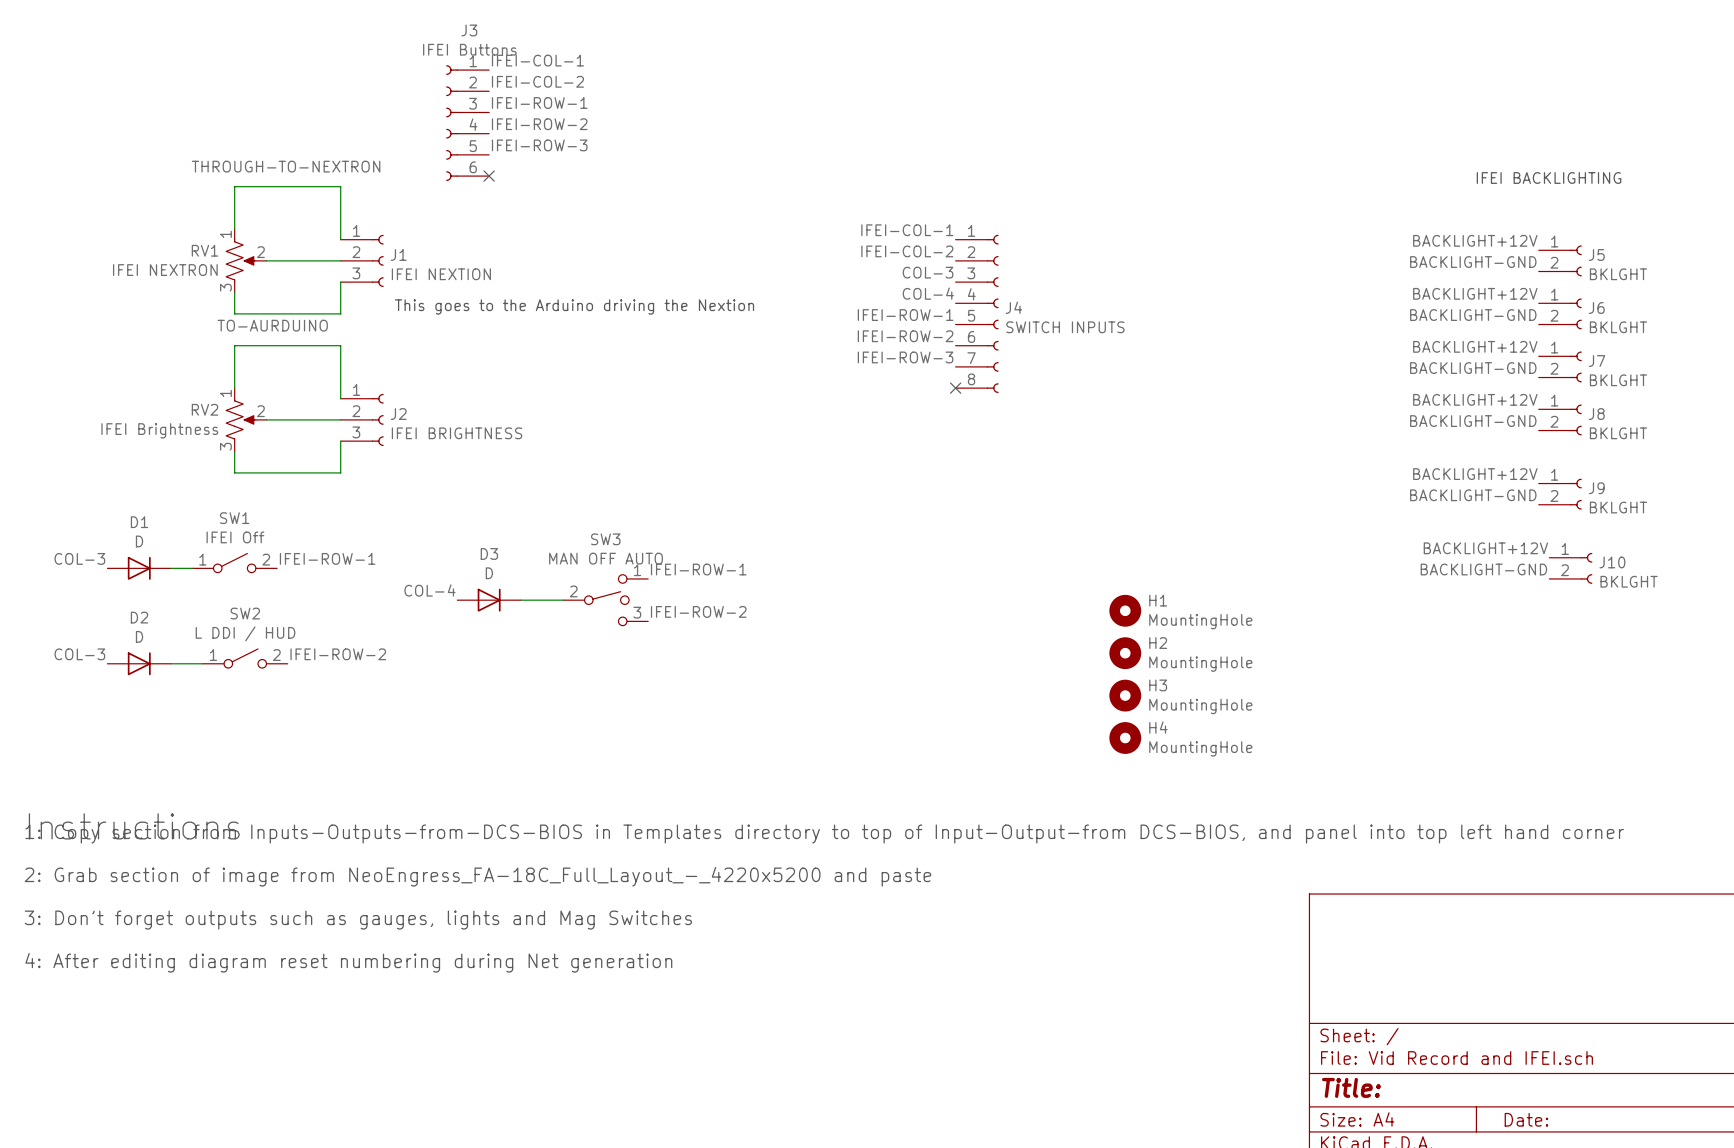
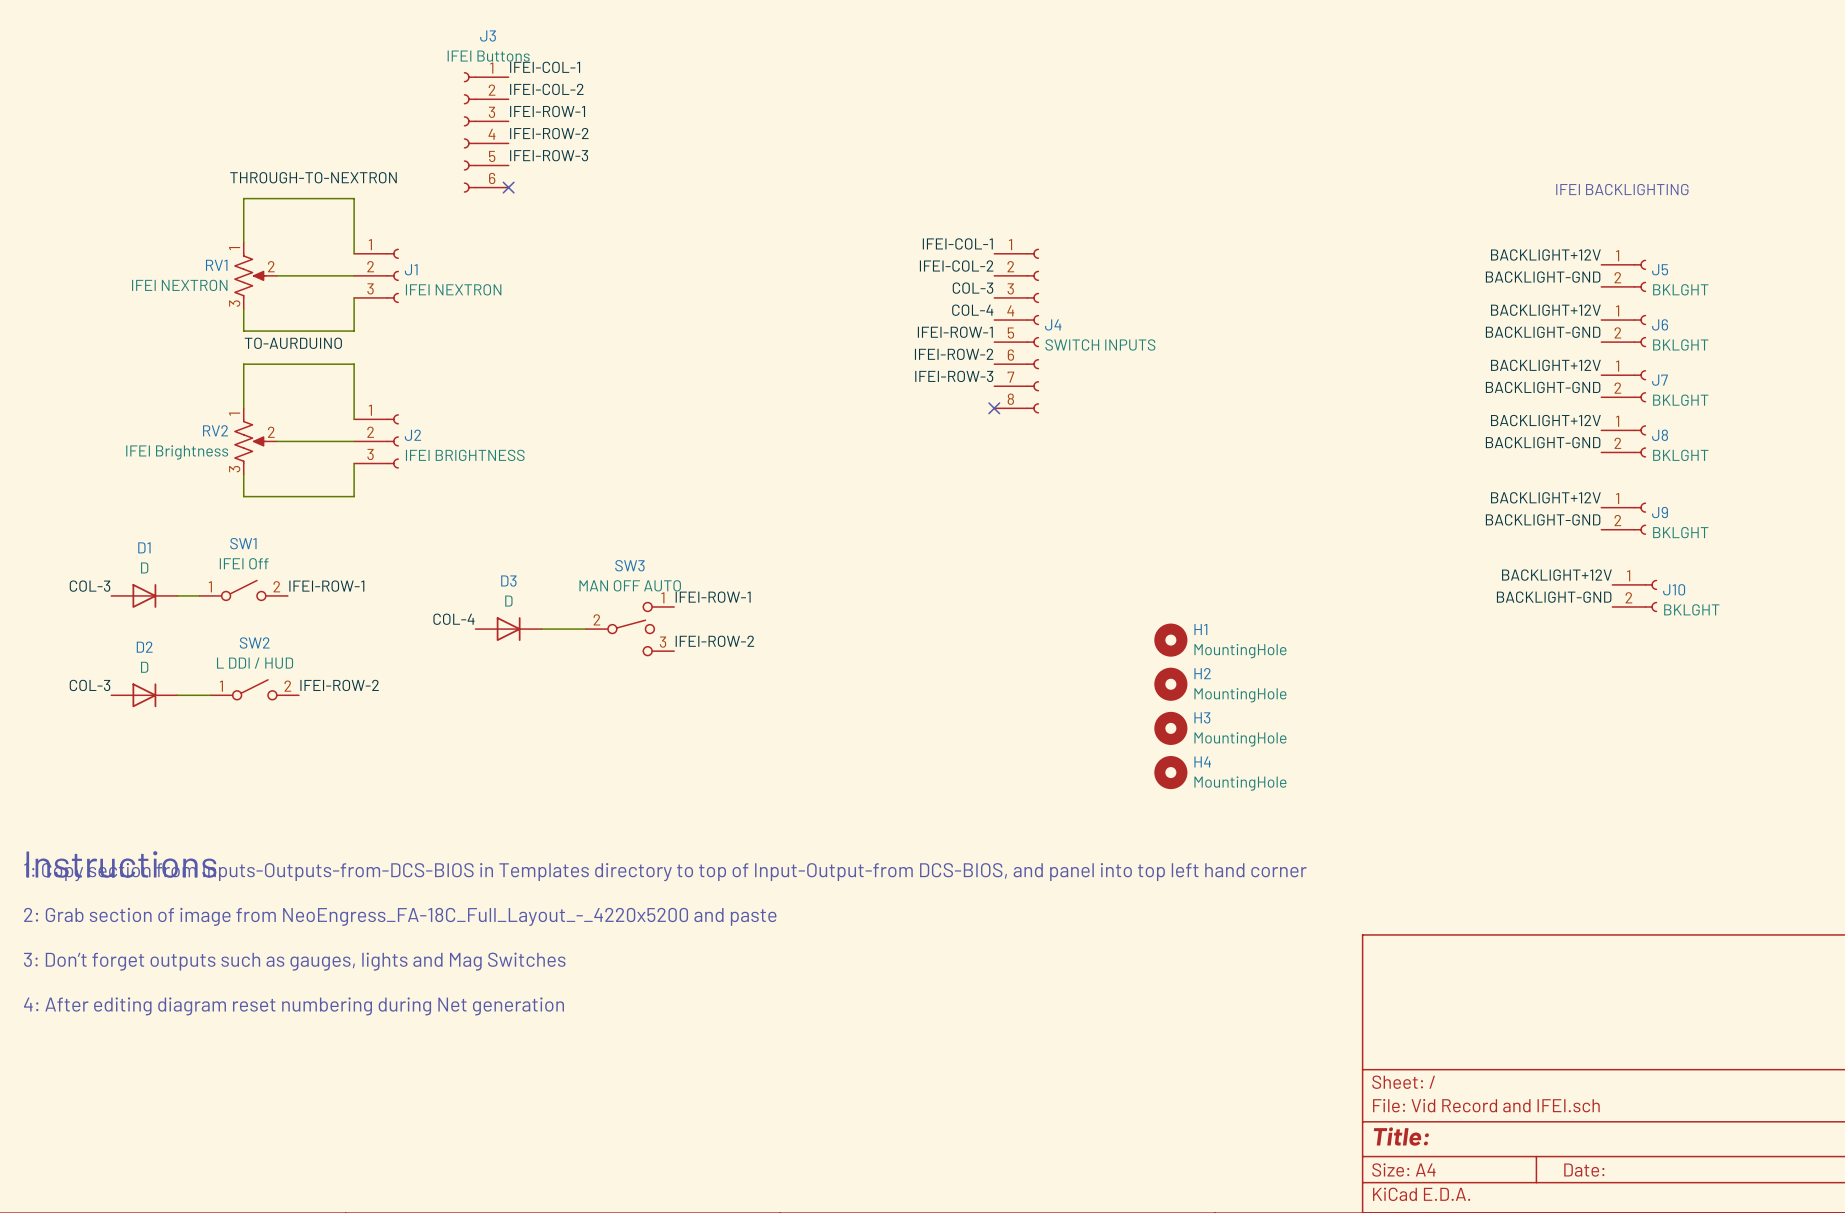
J1 value: IFEI NEXTION (441, 274) -> IFEI NEXTRON (453, 289)
text: This goes to the Arduino driving the Nextion (574, 306) -> none

